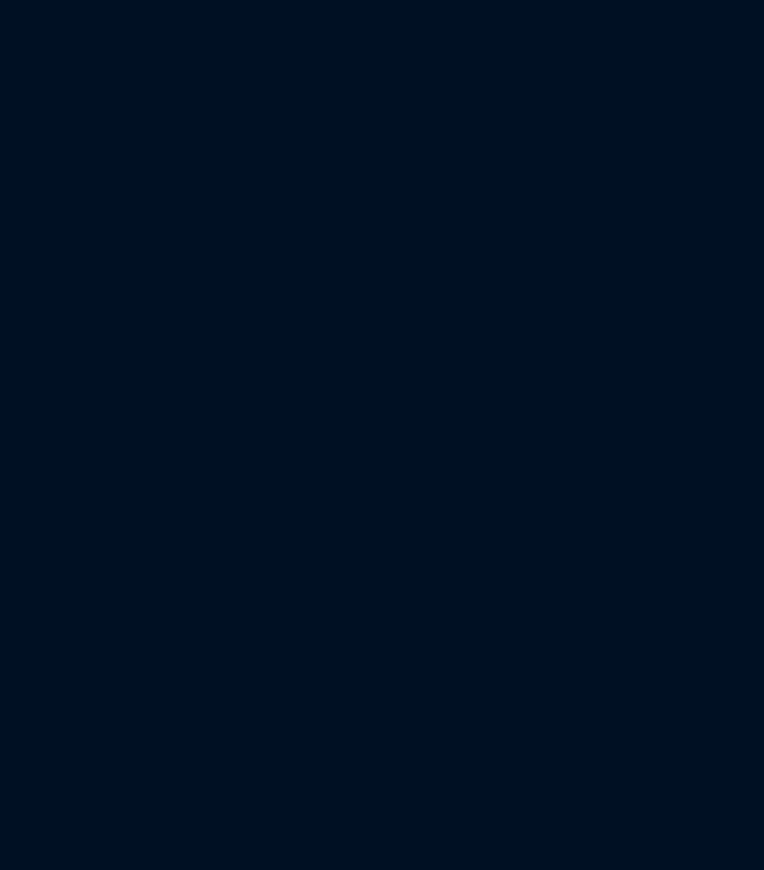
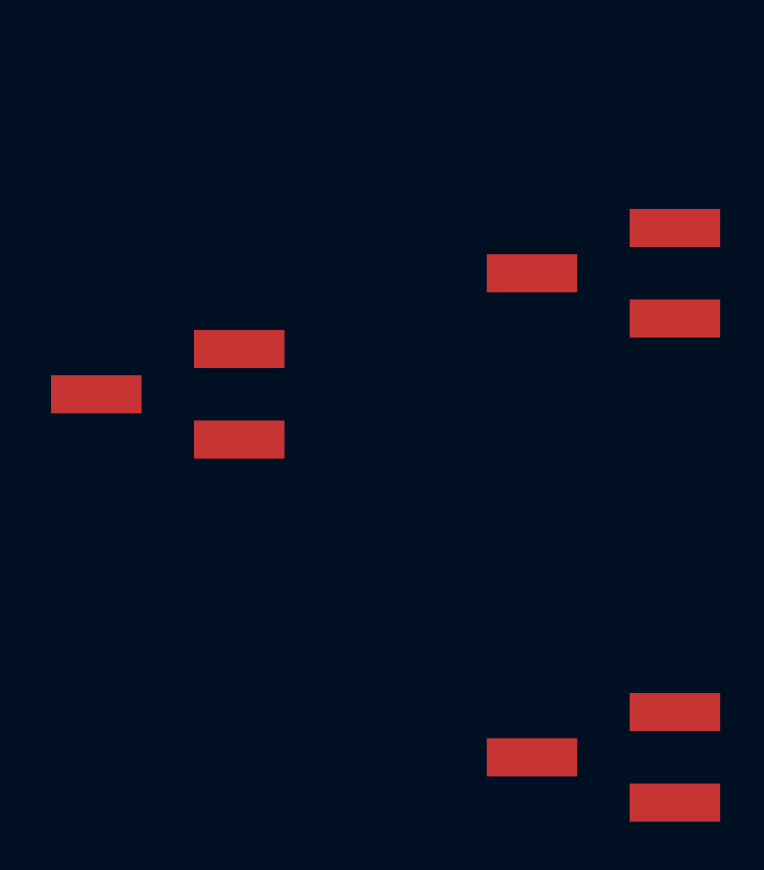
part: none -> (603, 273)
part: none -> (167, 394)
part: none -> (603, 757)

